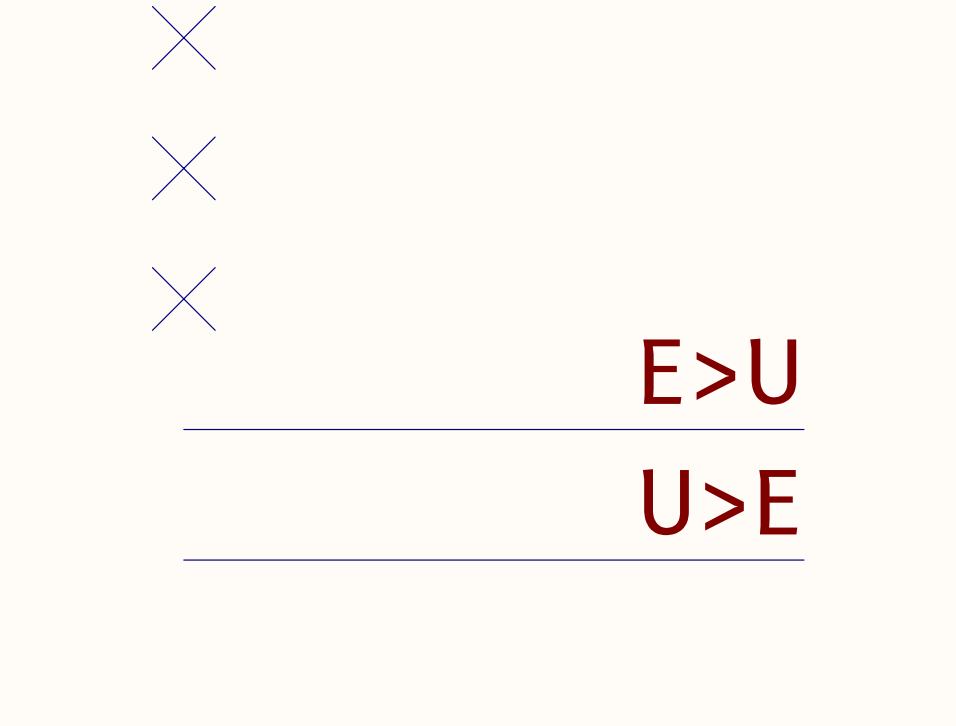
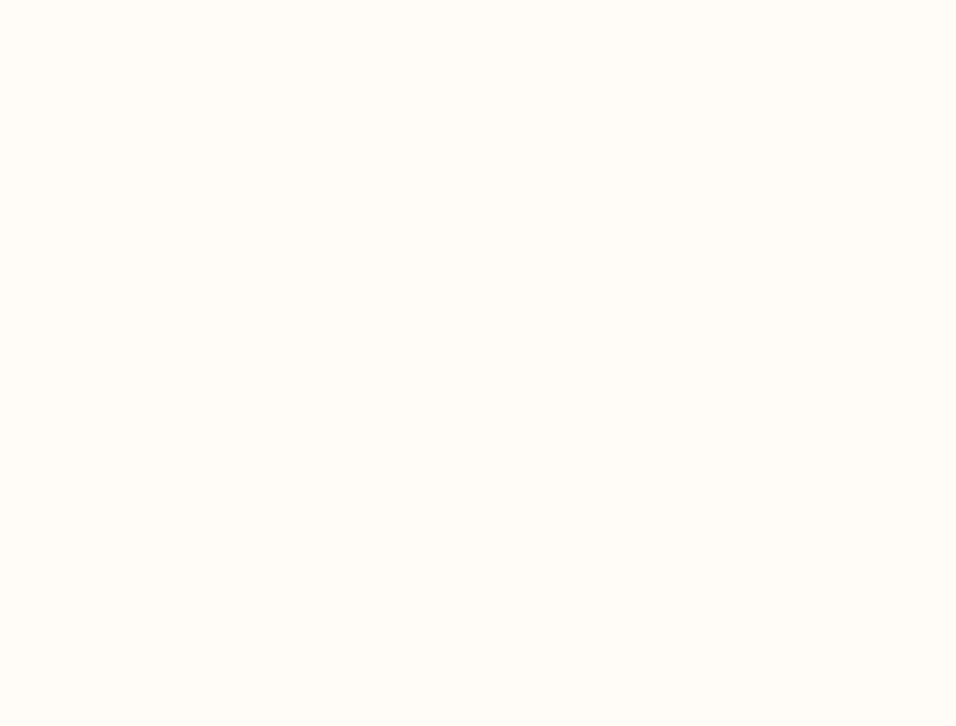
no-connect mark: (183, 37) -> none
no-connect mark: (183, 168) -> none
no-connect mark: (183, 298) -> none
label: E>U (719, 371) -> none
wire: (183, 429) (803, 429) -> none
label: U>E (720, 502) -> none
wire: (183, 560) (803, 560) -> none

